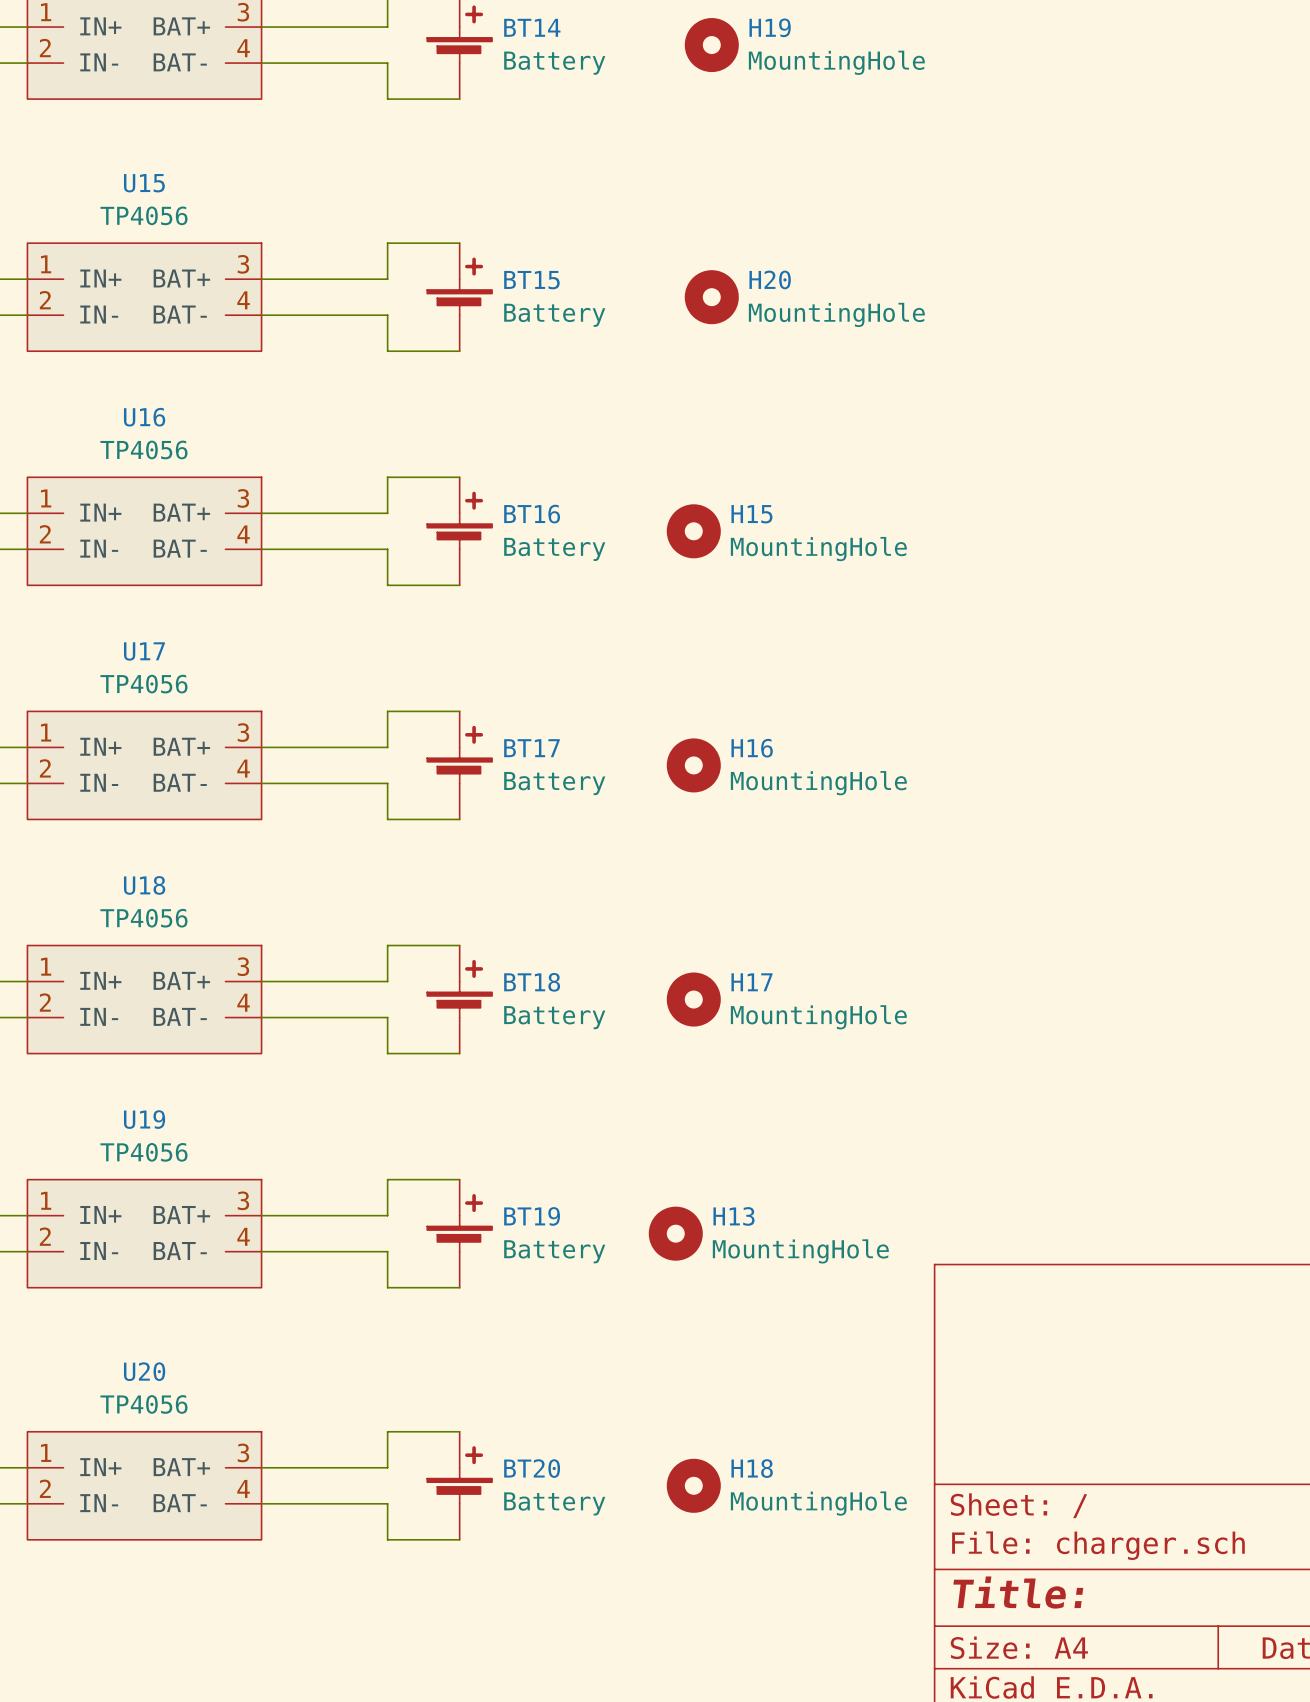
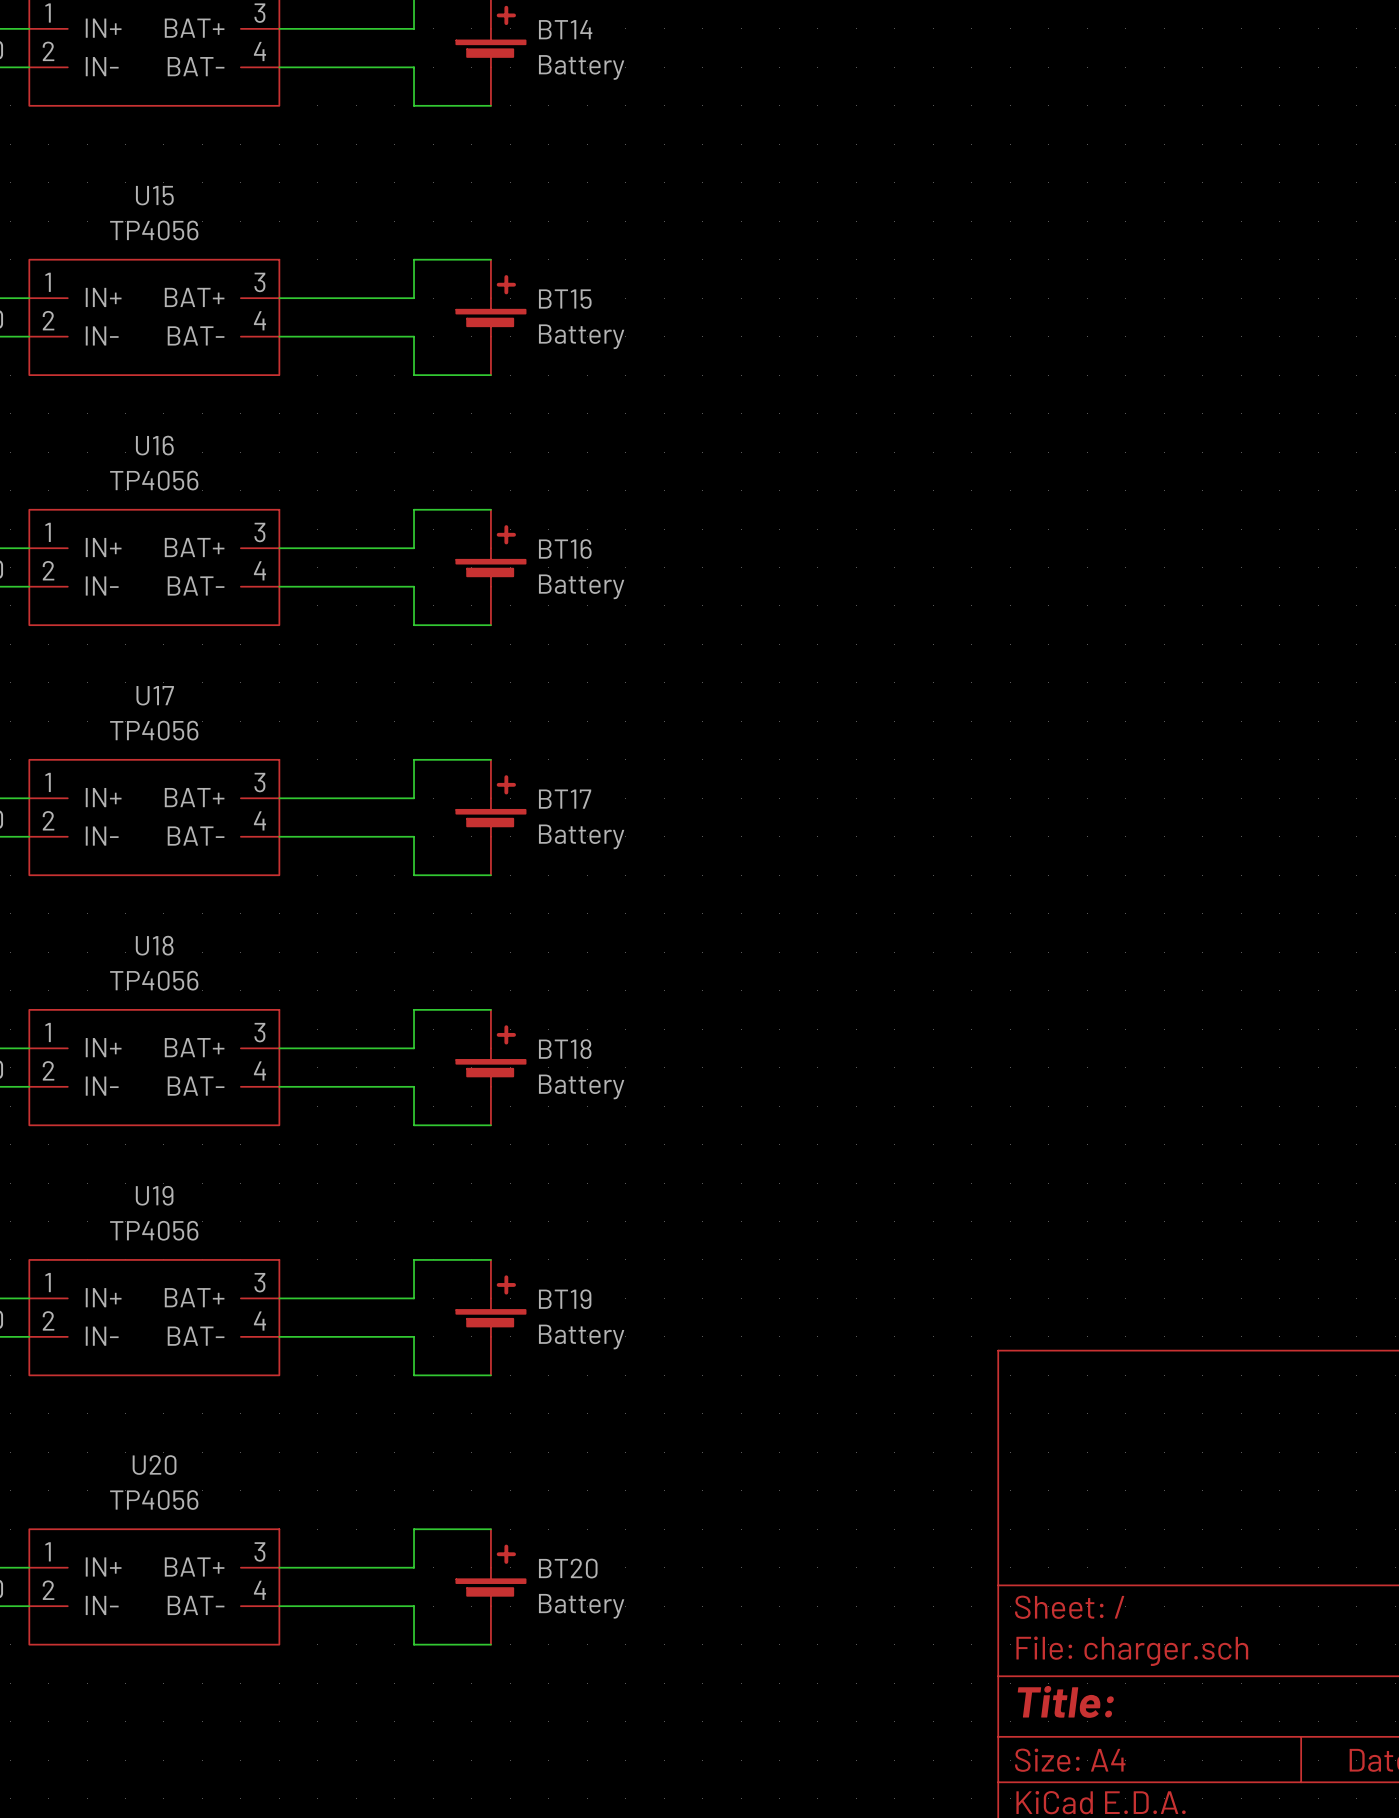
H19: MountingHole (711, 45) -> none
H20: MountingHole (711, 297) -> none
H15: MountingHole (693, 531) -> none
H16: MountingHole (693, 765) -> none
H17: MountingHole (693, 999) -> none
H13: MountingHole (675, 1233) -> none
H18: MountingHole (693, 1485) -> none

